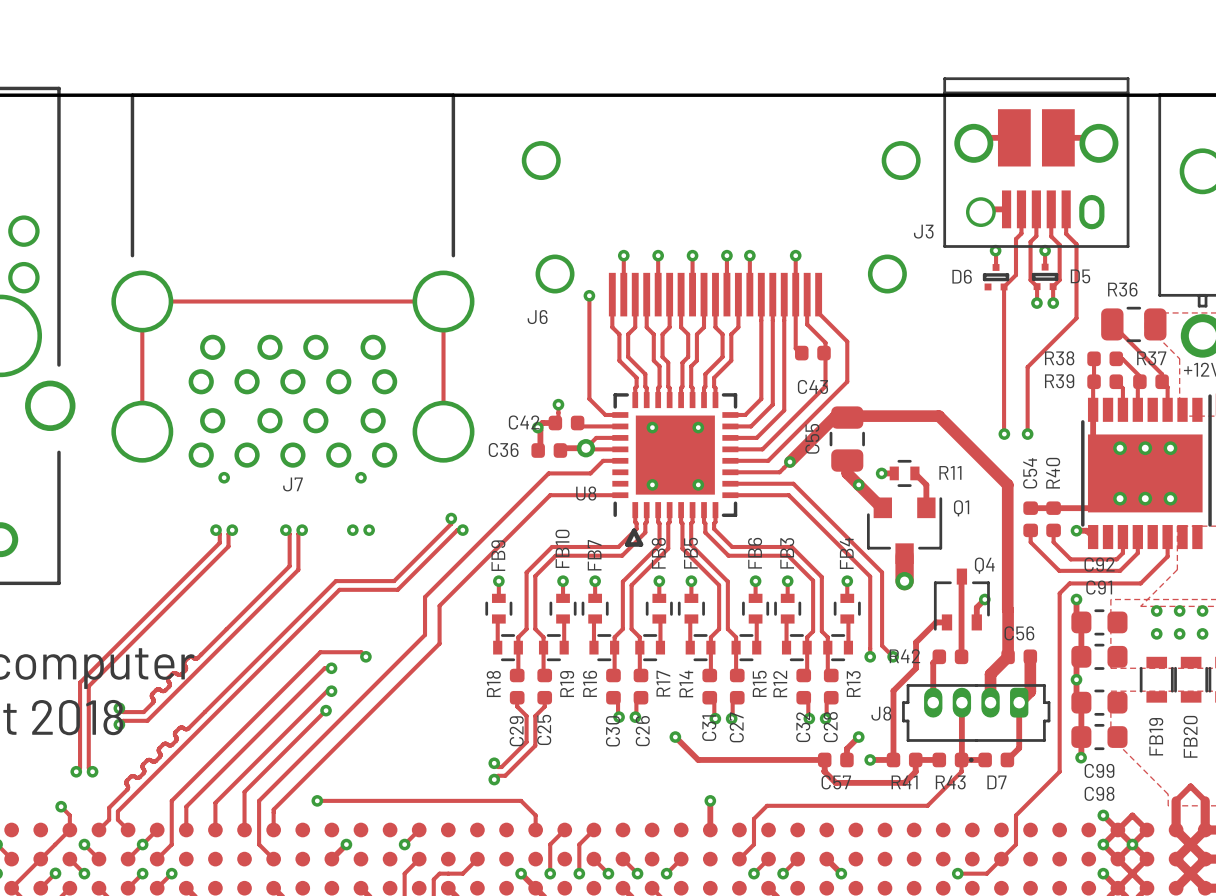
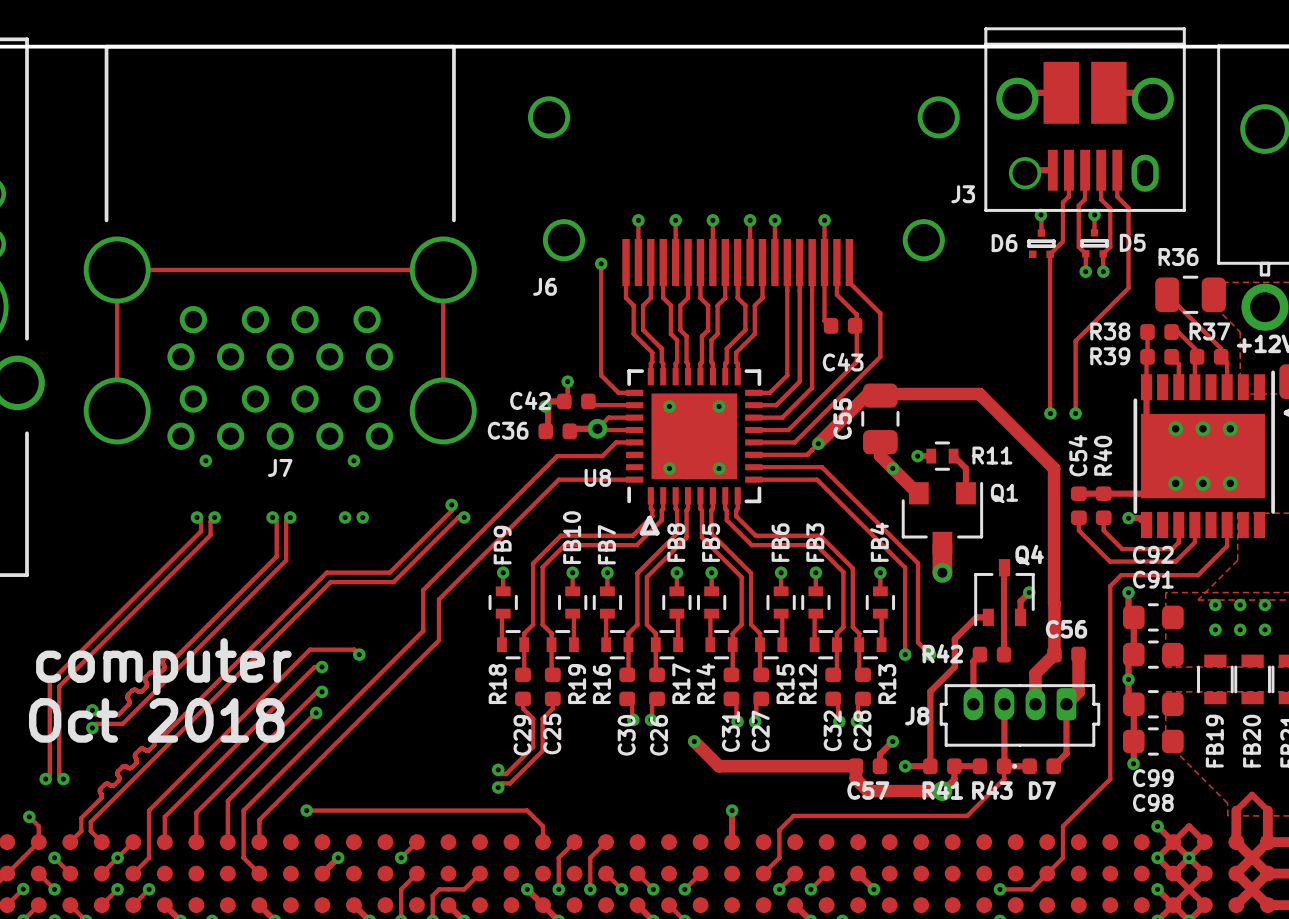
track width: thin (675, 737) (698, 759) (824, 759) (824, 771) -> thick (694, 741) (719, 766) (855, 766) (855, 778)
track width: thin (824, 771) (835, 782) (904, 782) -> thick (855, 778) (867, 791) (942, 791)
via: none -> (942, 791)

